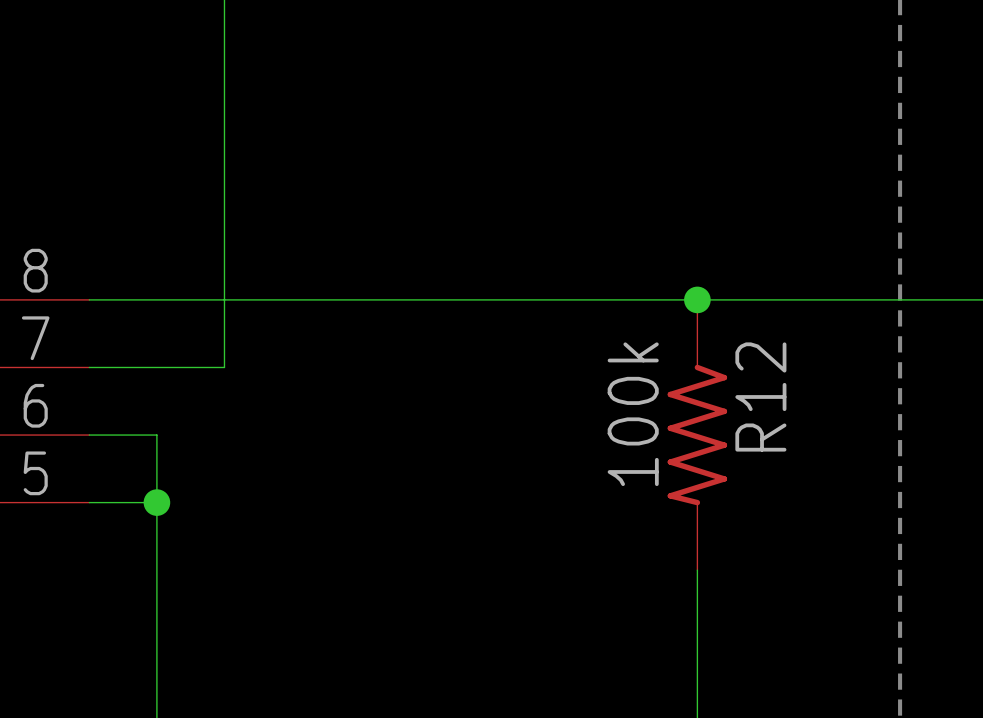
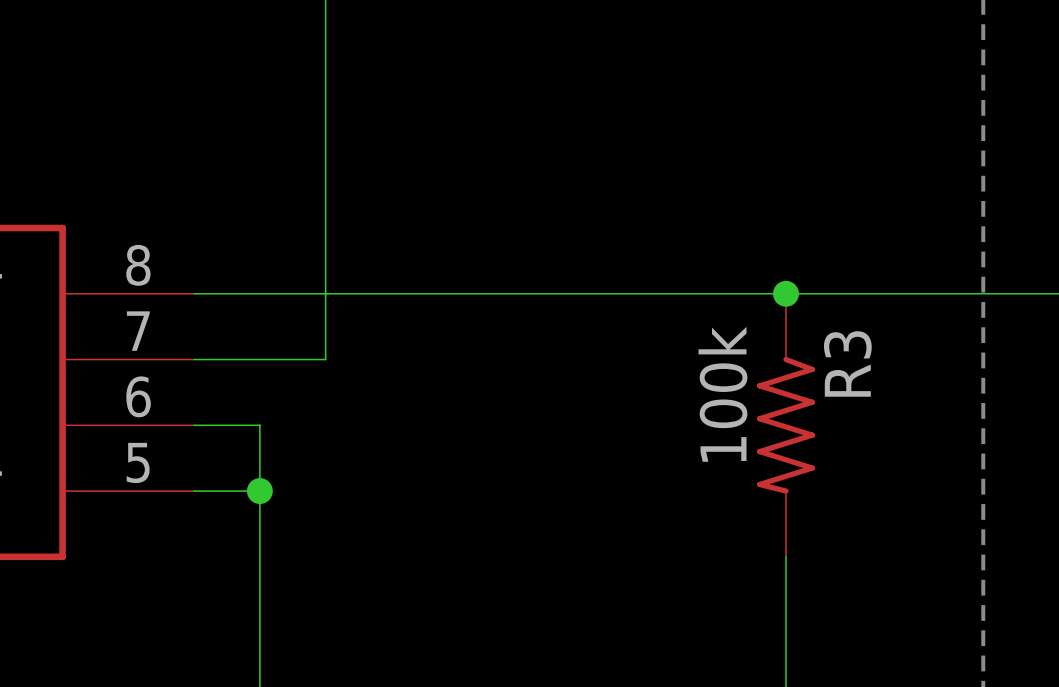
R12 name: R12 (760, 396) -> R3 (847, 363)

